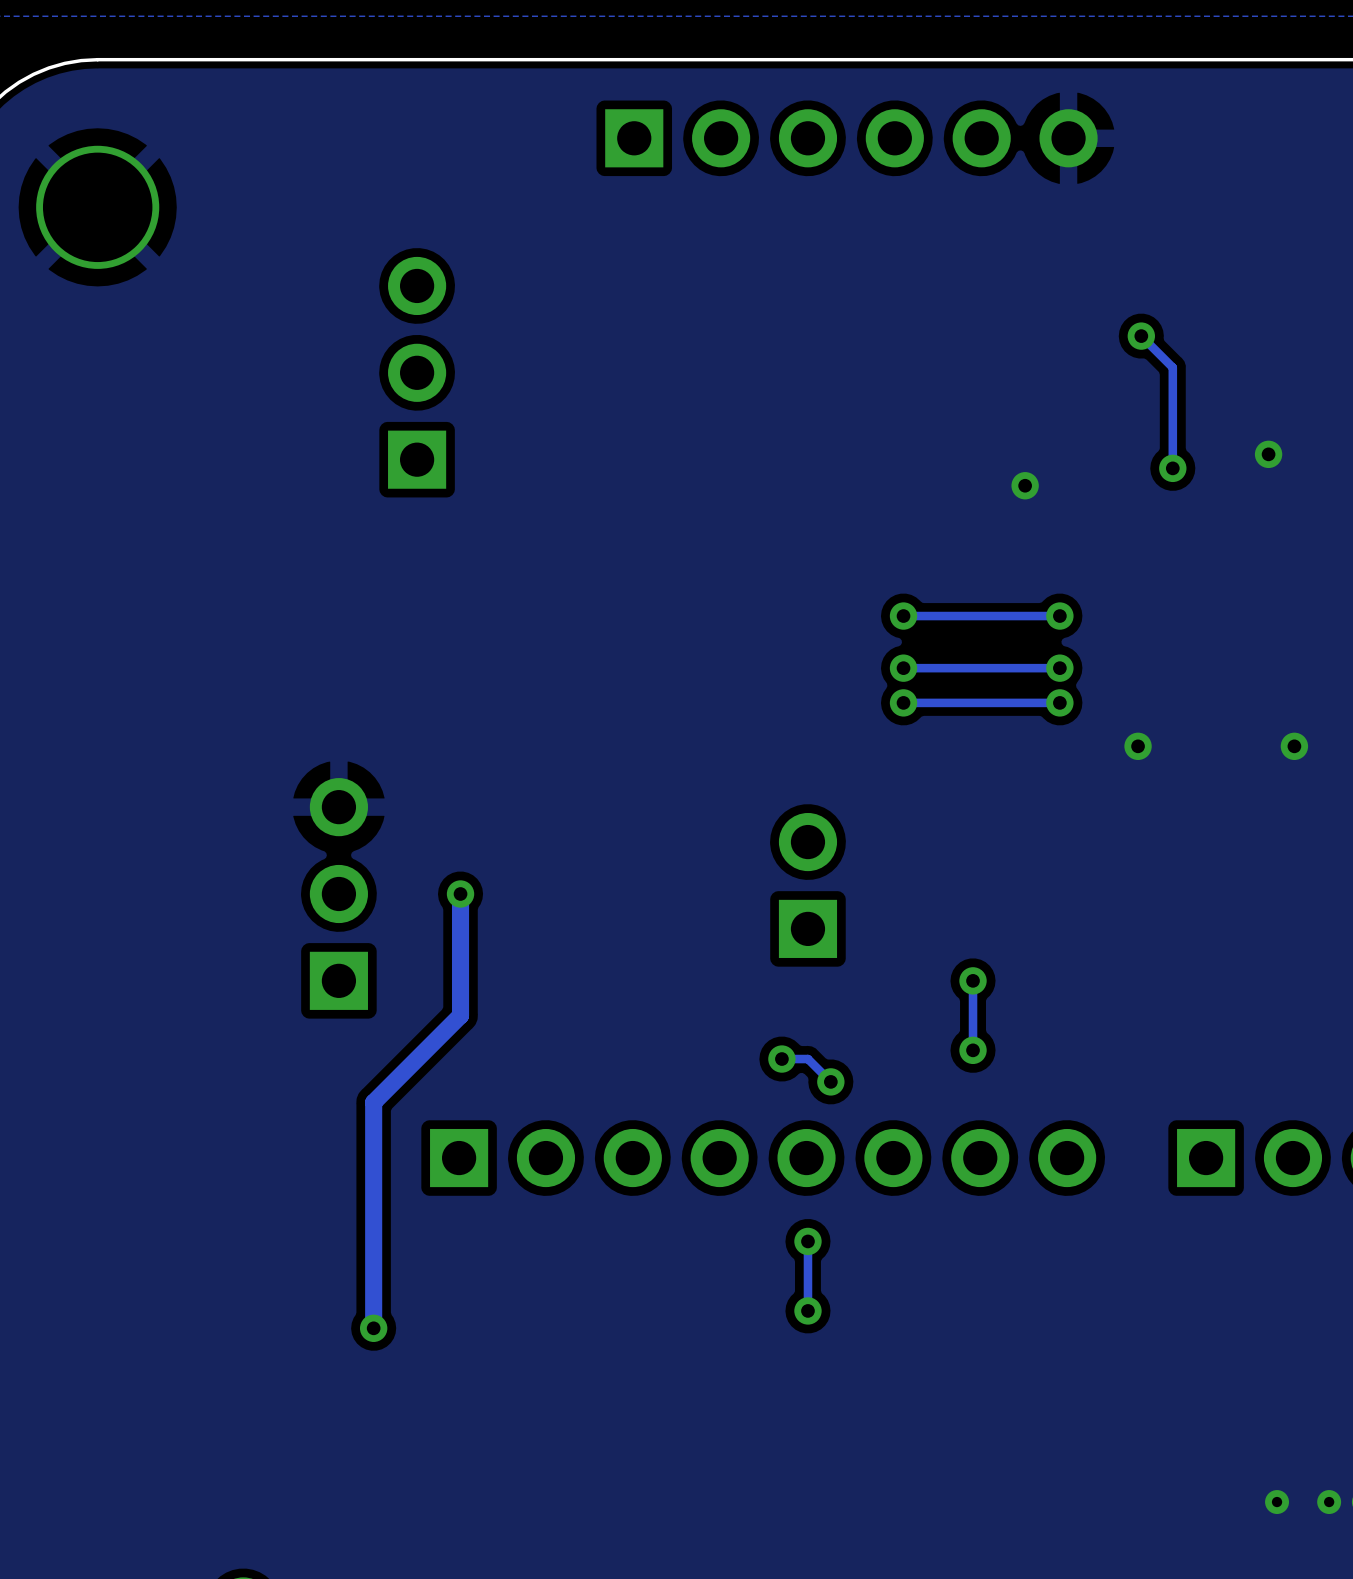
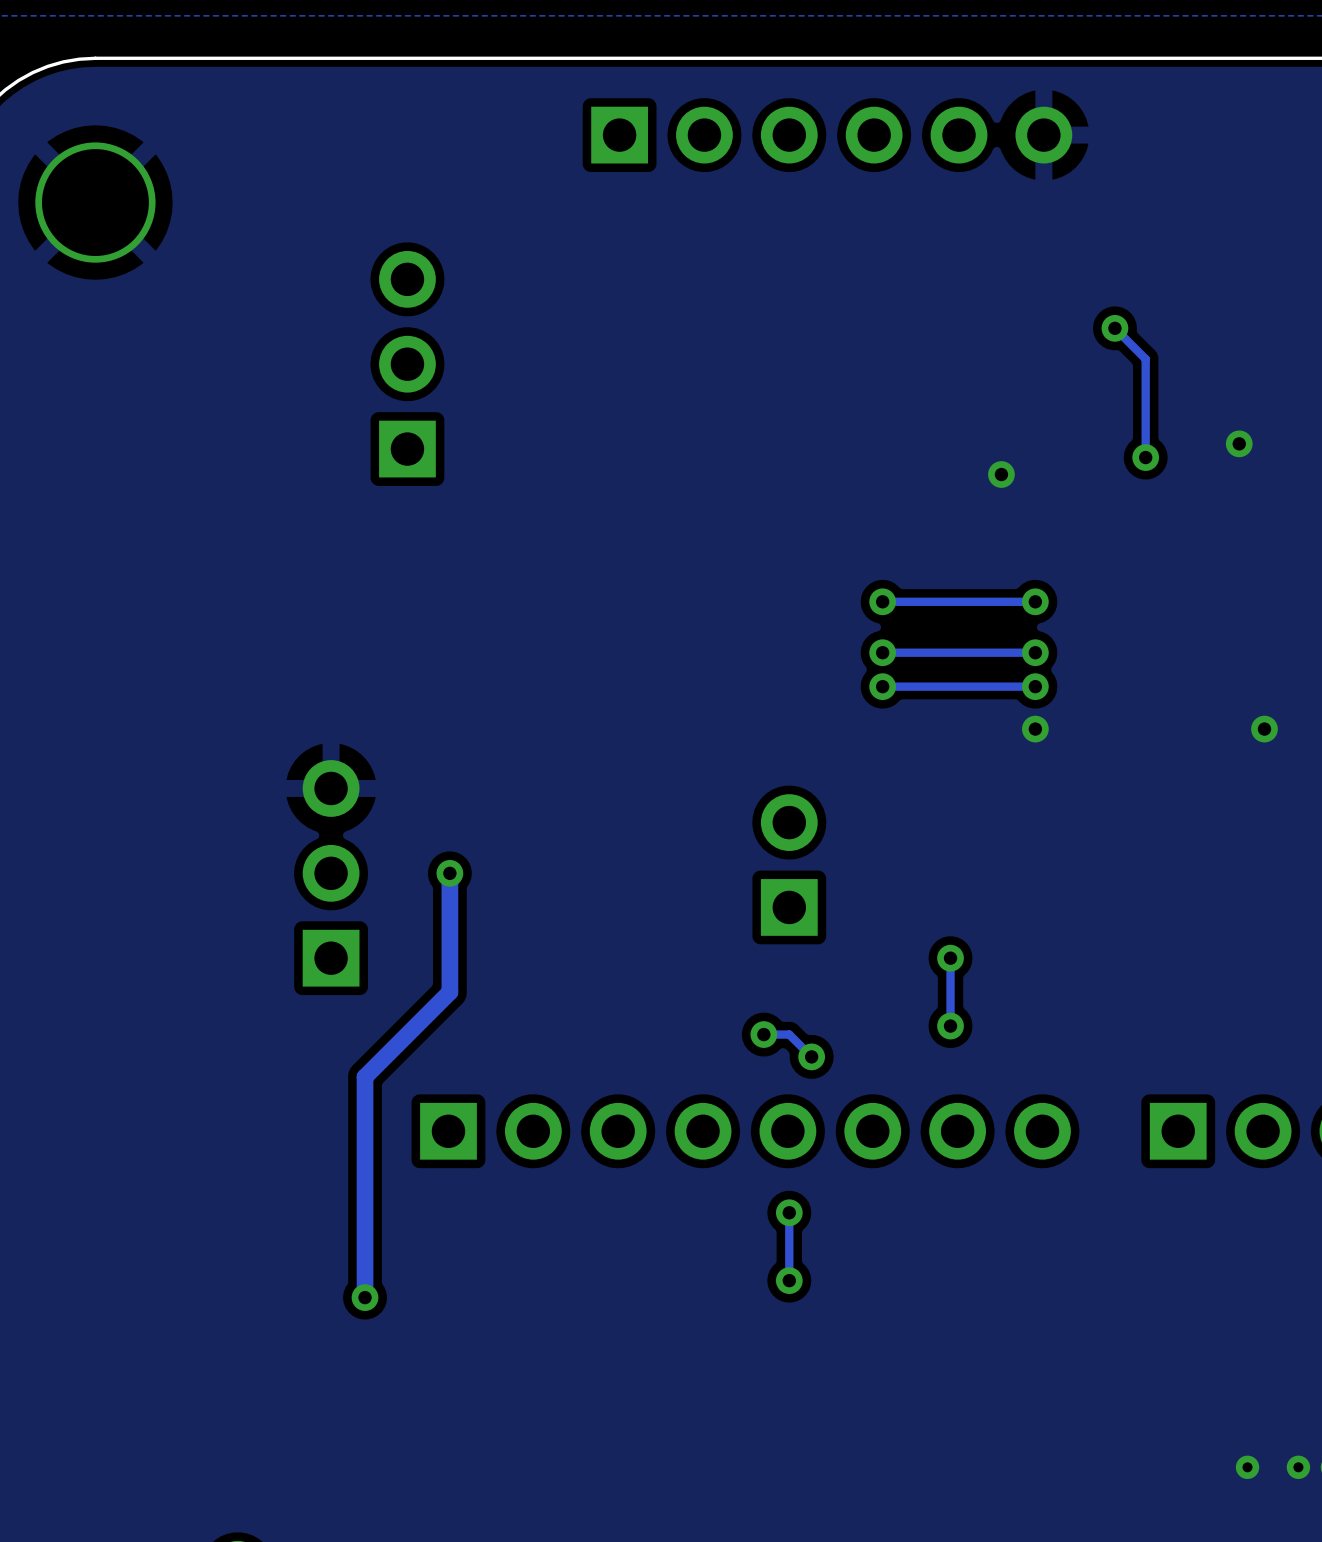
via position: (1138, 746) -> (1035, 729)

